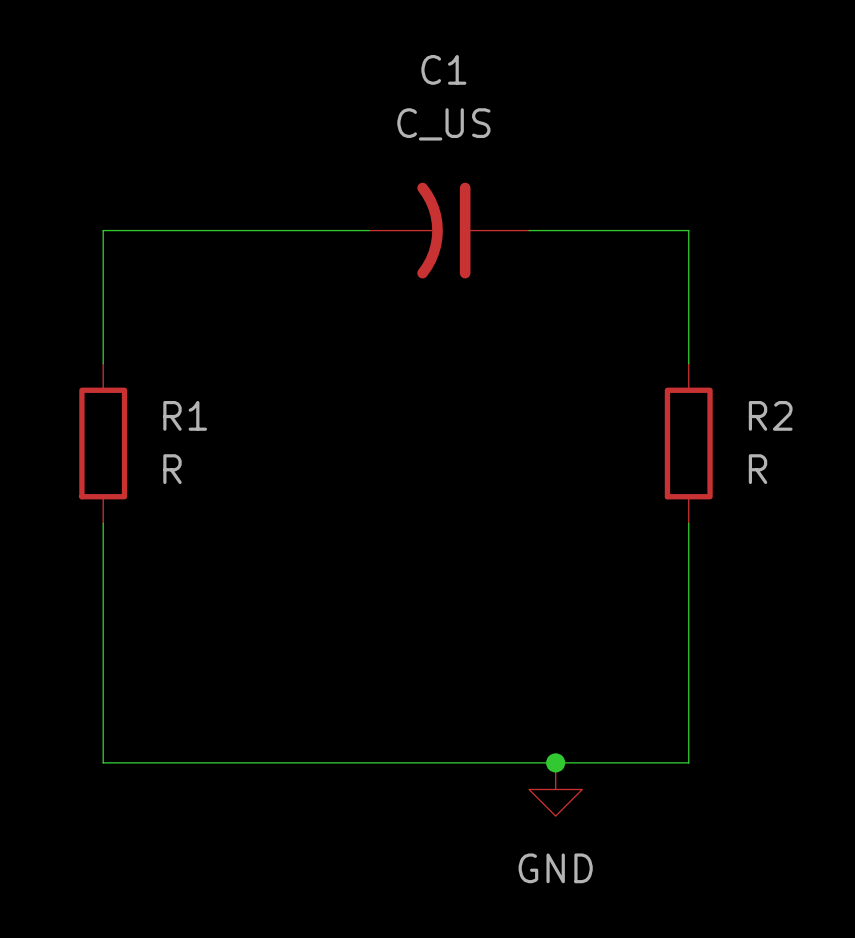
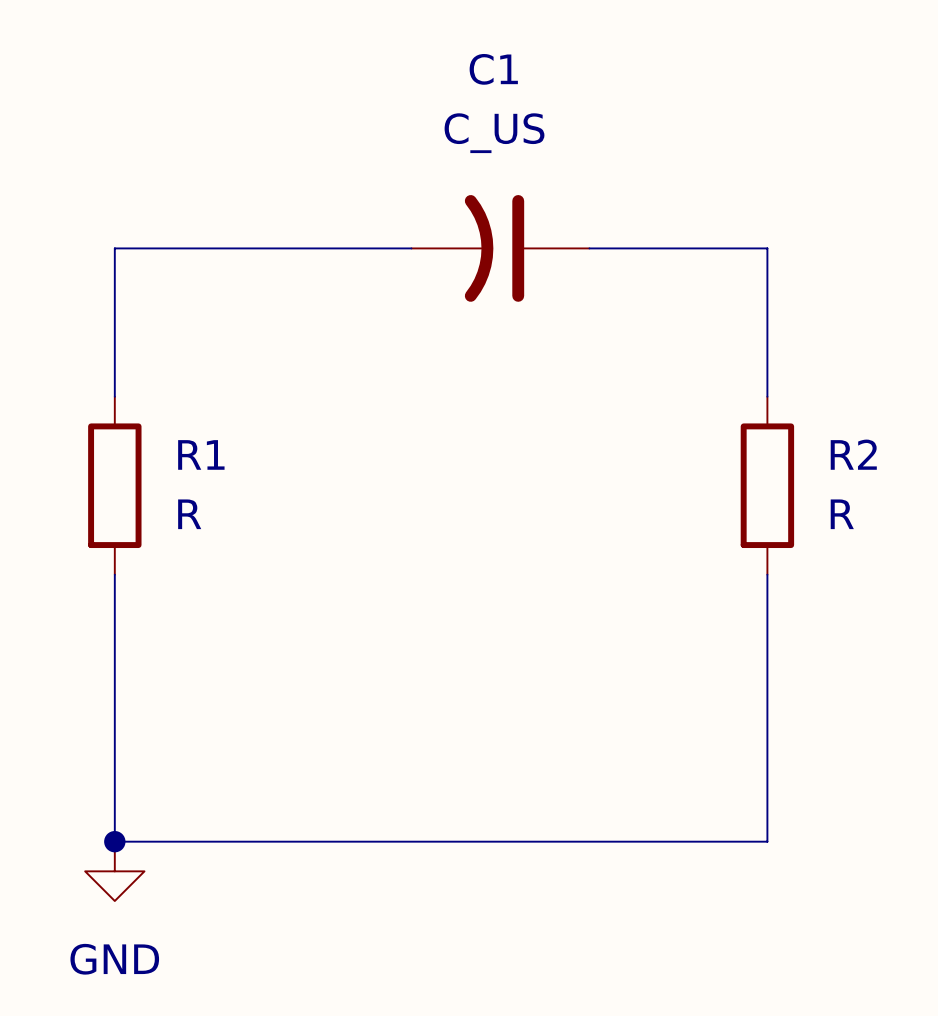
junction: none -> (114, 841)
junction: (555, 762) -> none
power symbol position: GND (555, 789) -> GND (114, 871)

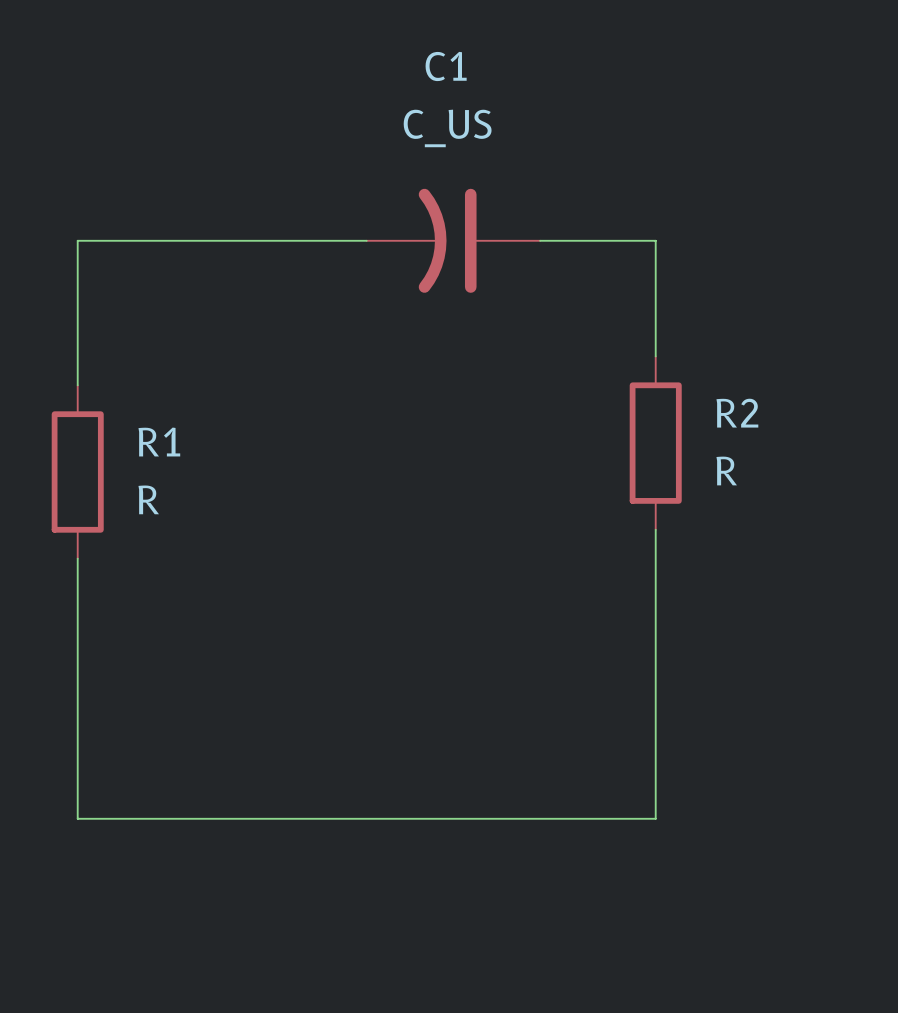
wire: (708, 248) (767, 248) (767, 396) -> (655, 240) (655, 356)
R2 position: (767, 485) -> (655, 443)
wire: (767, 574) (767, 841) (708, 841) -> (655, 529) (655, 818)
junction: (114, 841) -> none
power symbol: GND (114, 871) -> none

